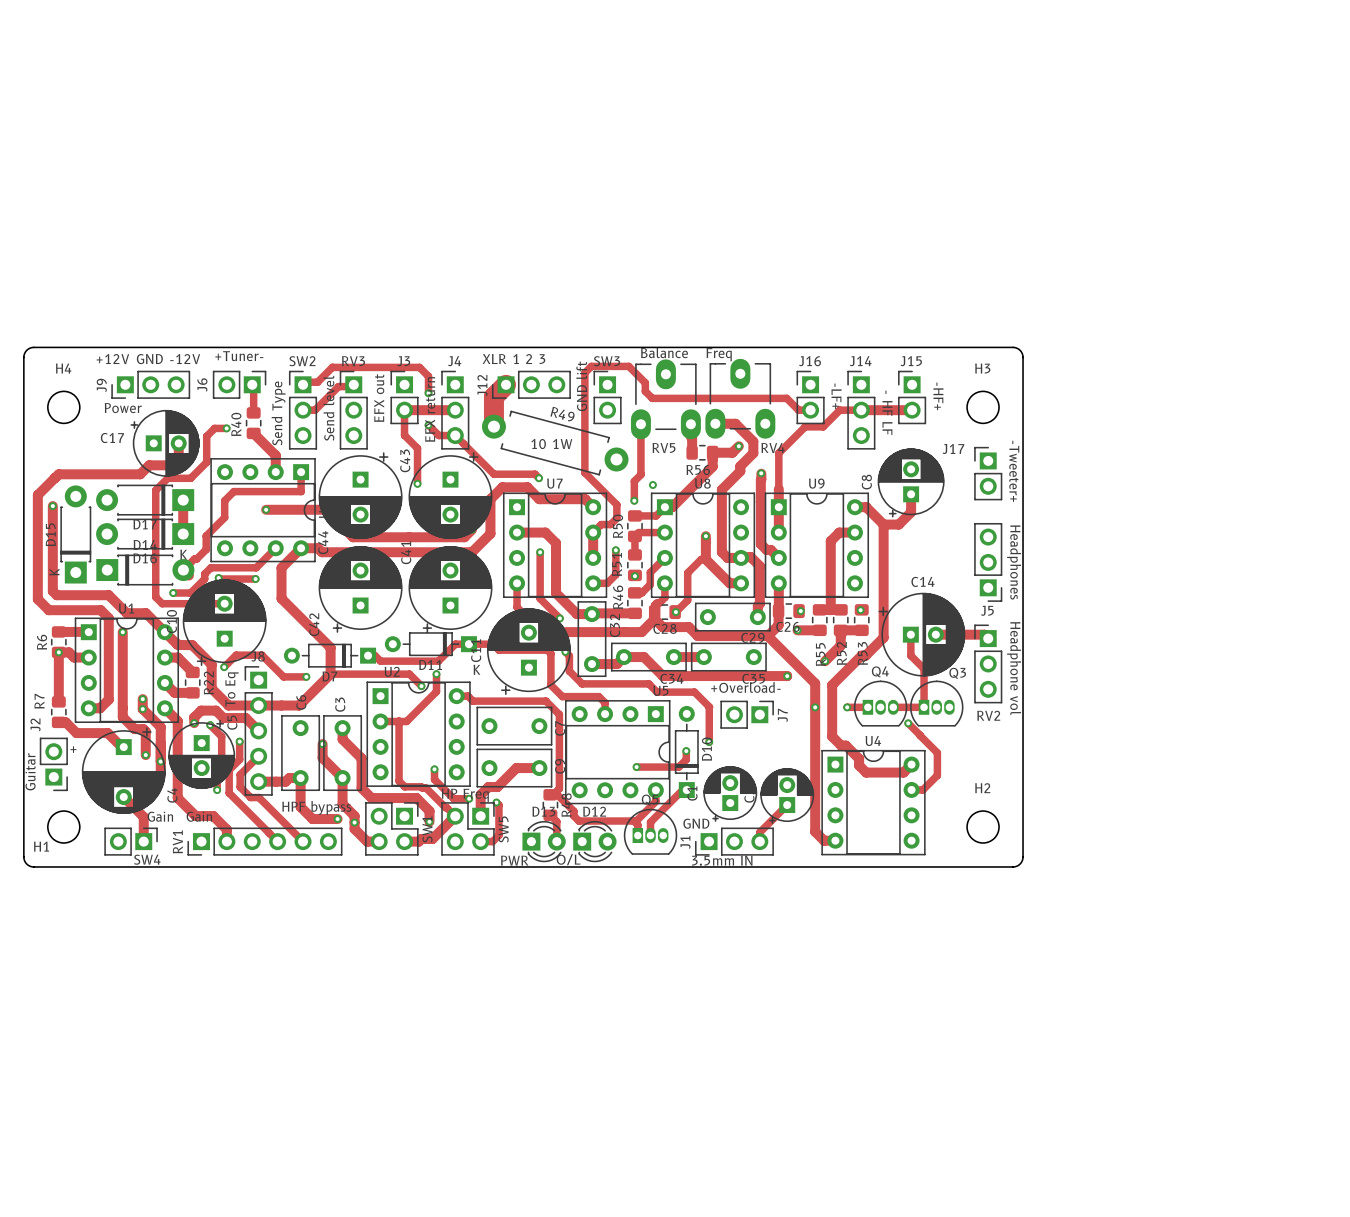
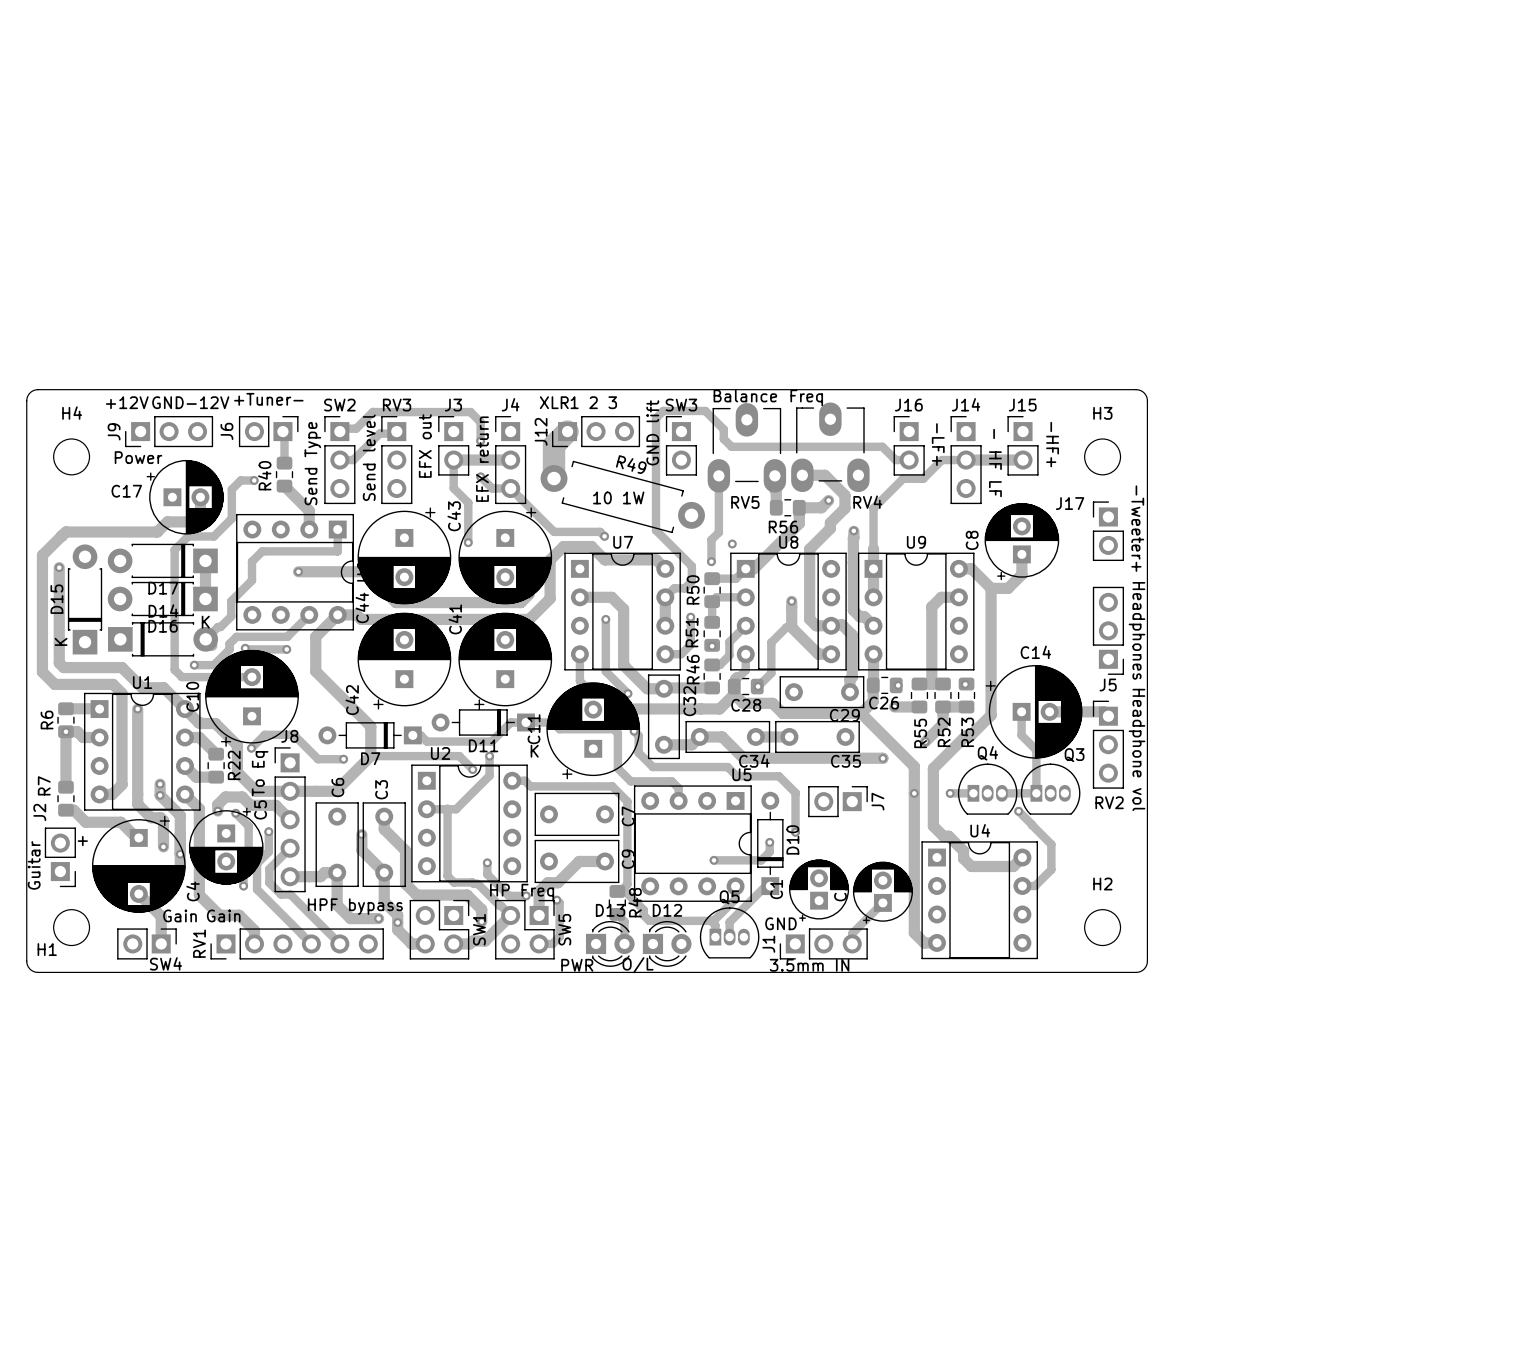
text: +Overload- (745, 687) -> none

